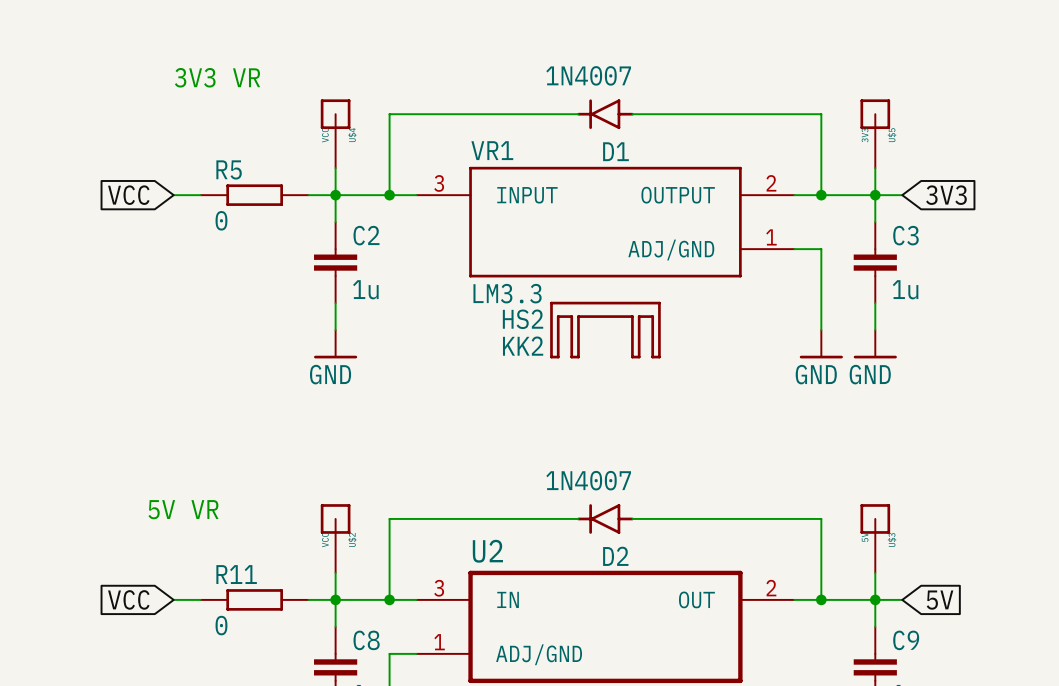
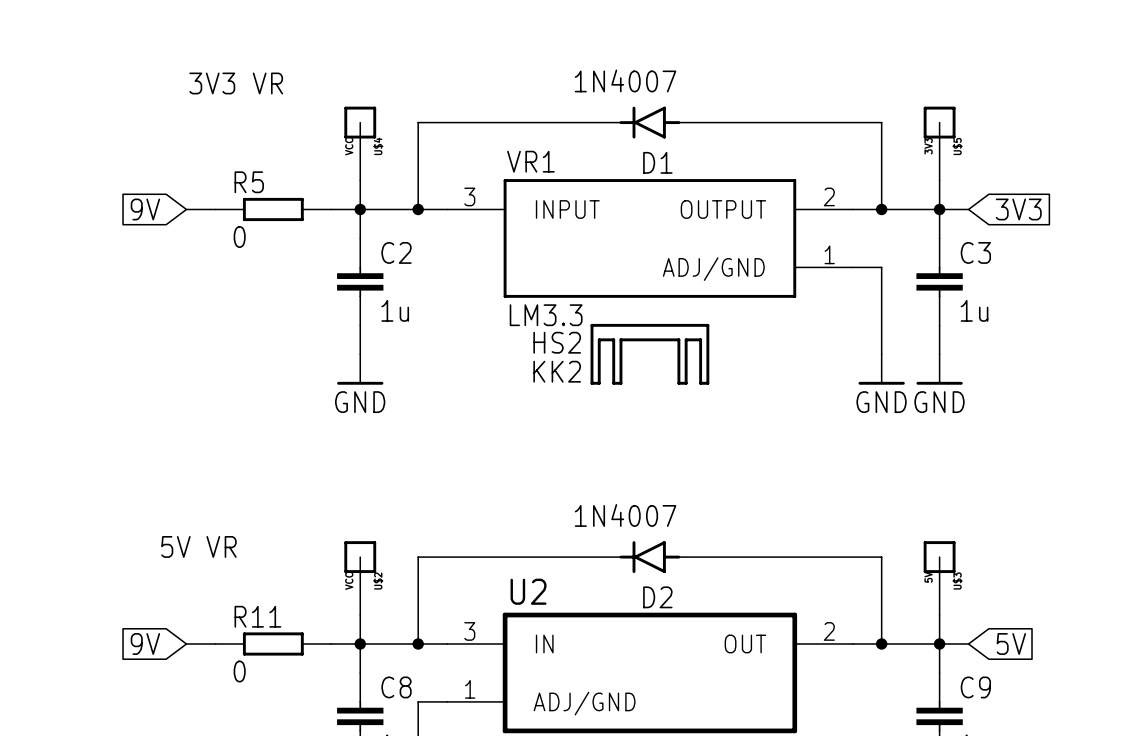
global label: VCC (128, 195) -> 9V (145, 209)
global label: VCC (128, 599) -> 9V (145, 643)

